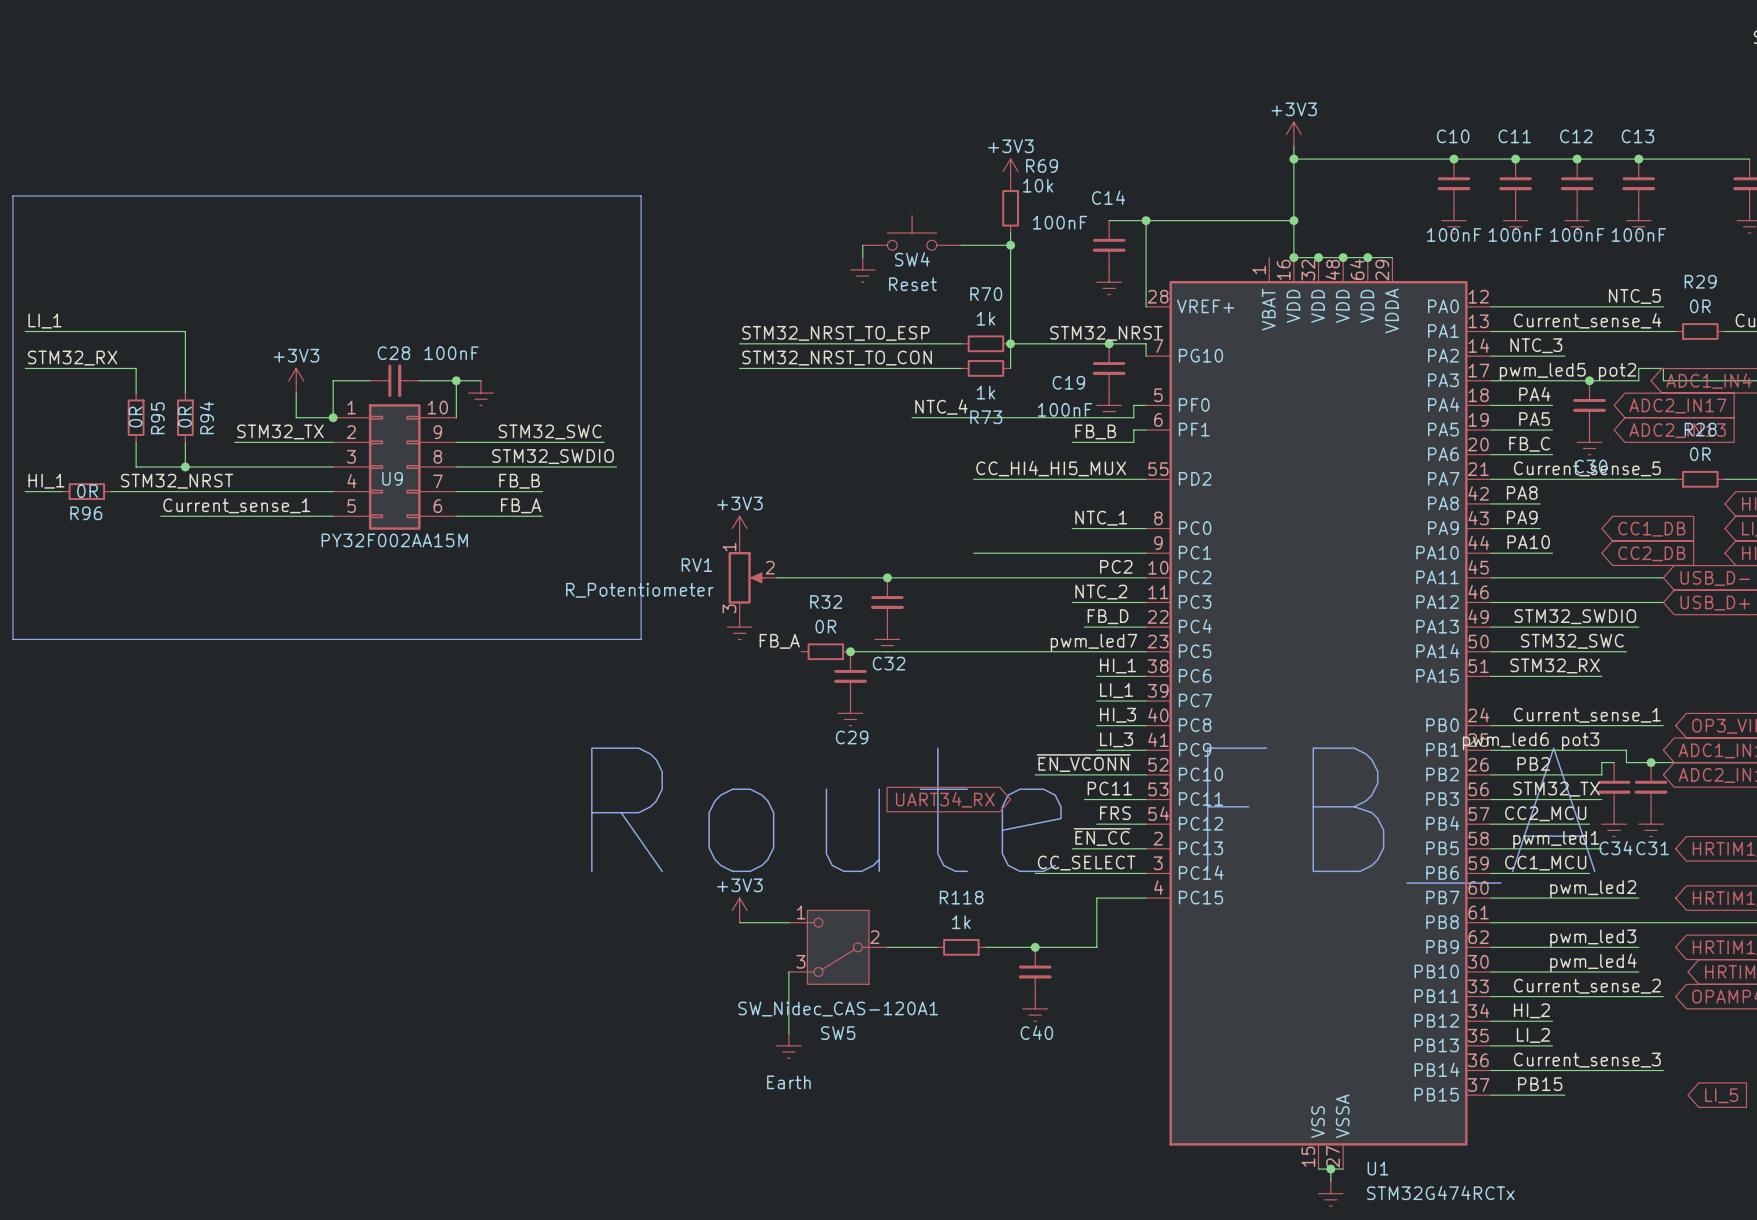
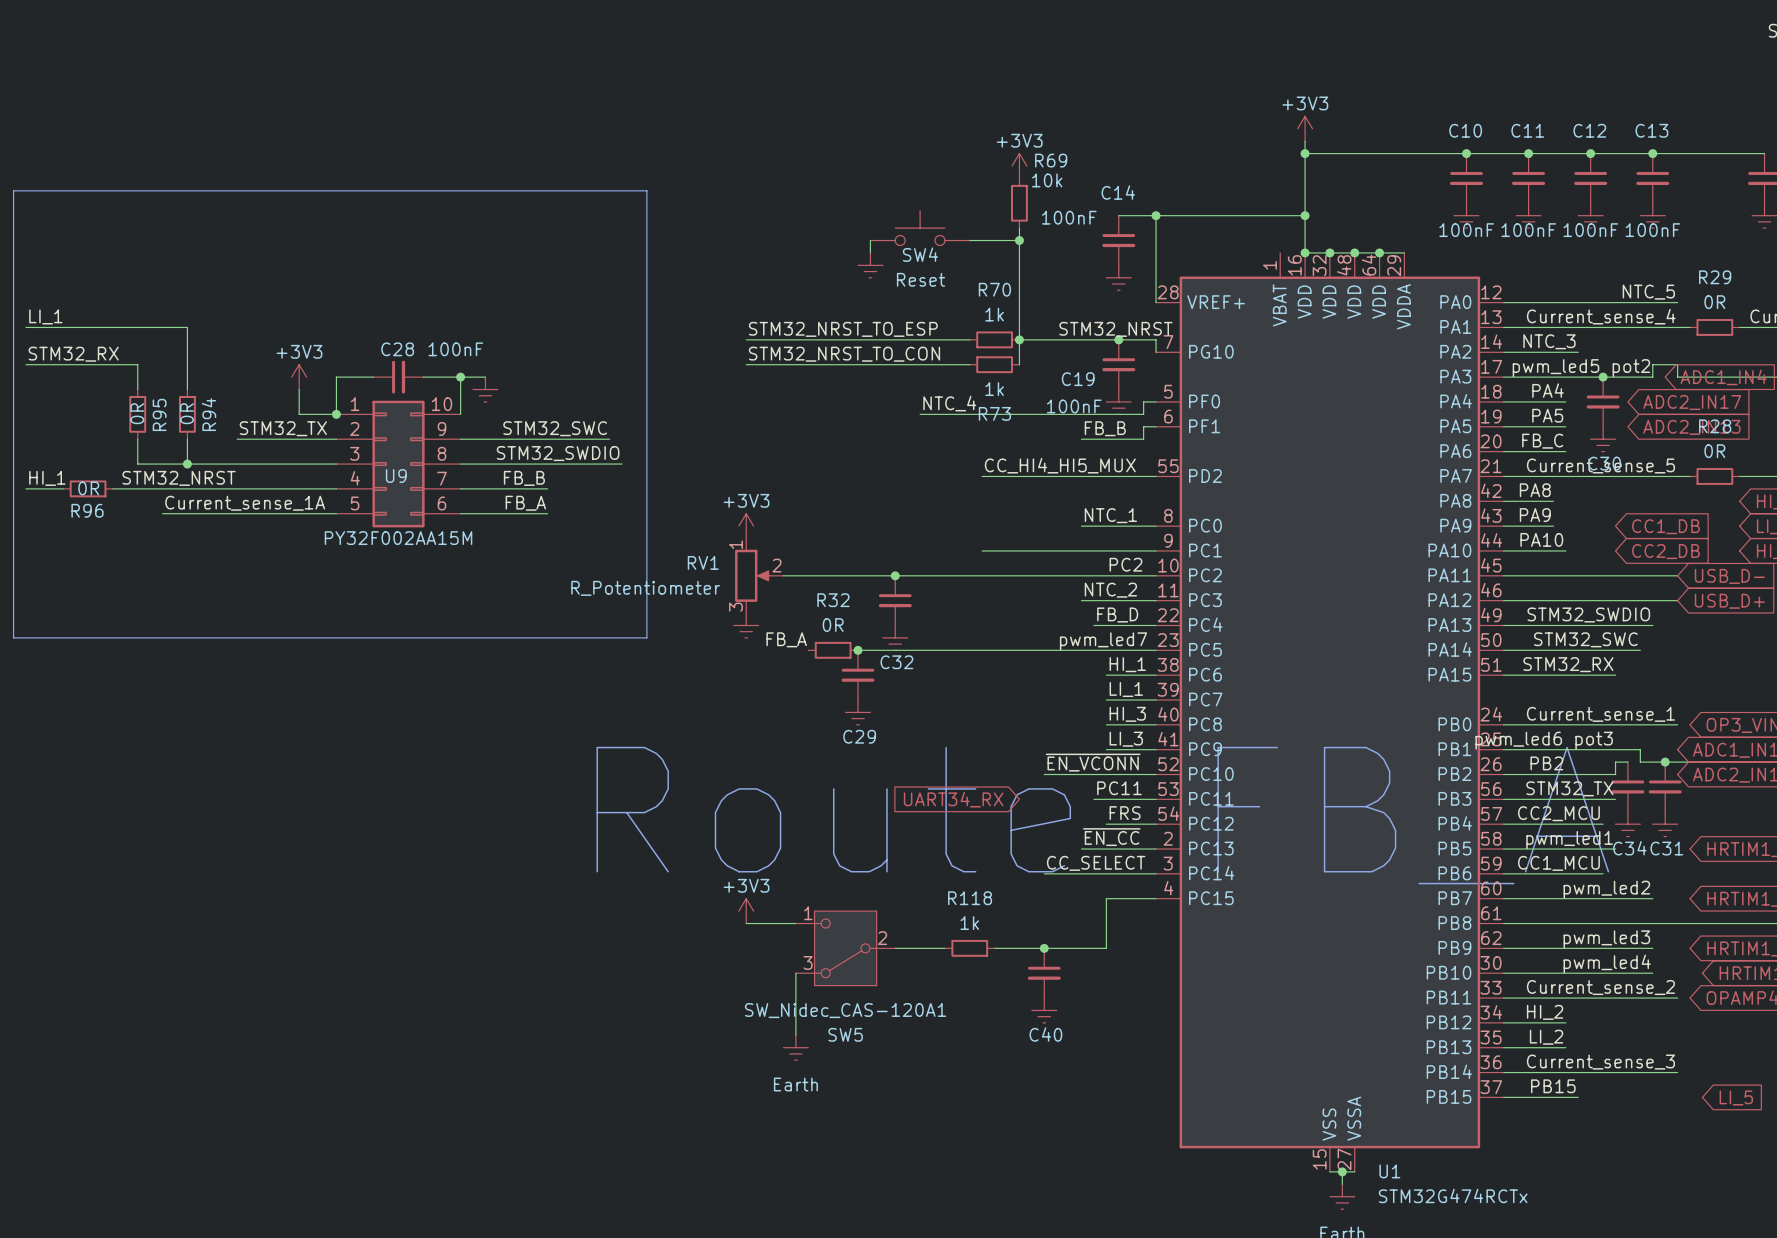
label: Current_sense_1 (236, 505) -> Current_sense_1A (245, 503)

